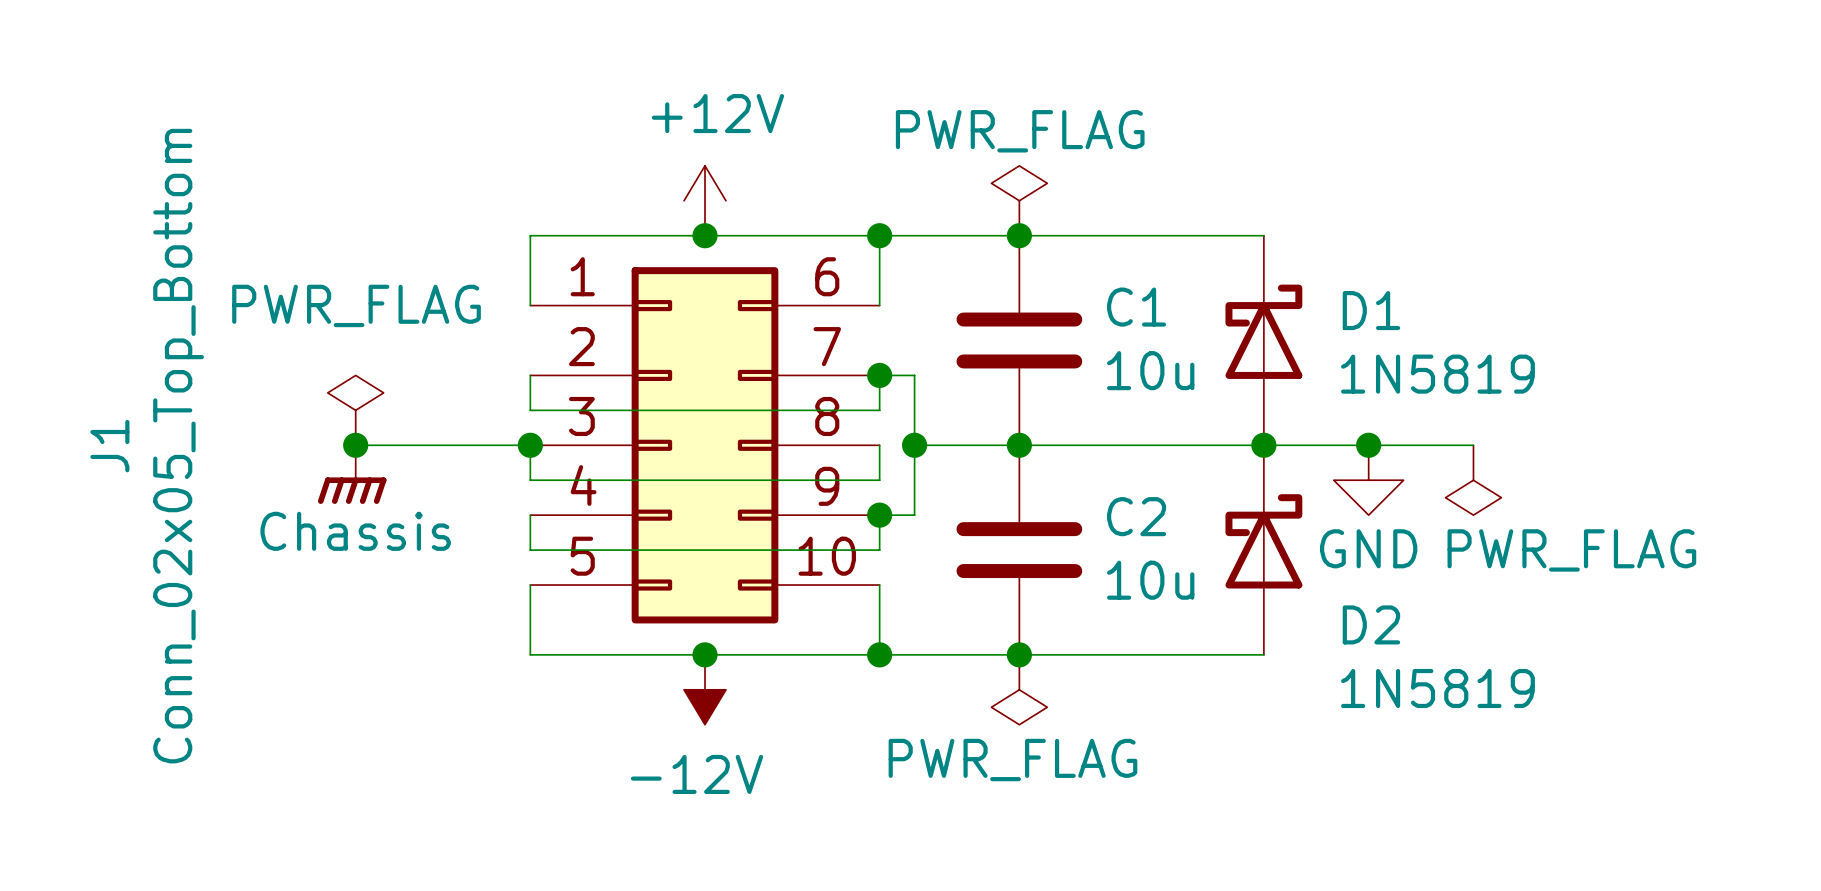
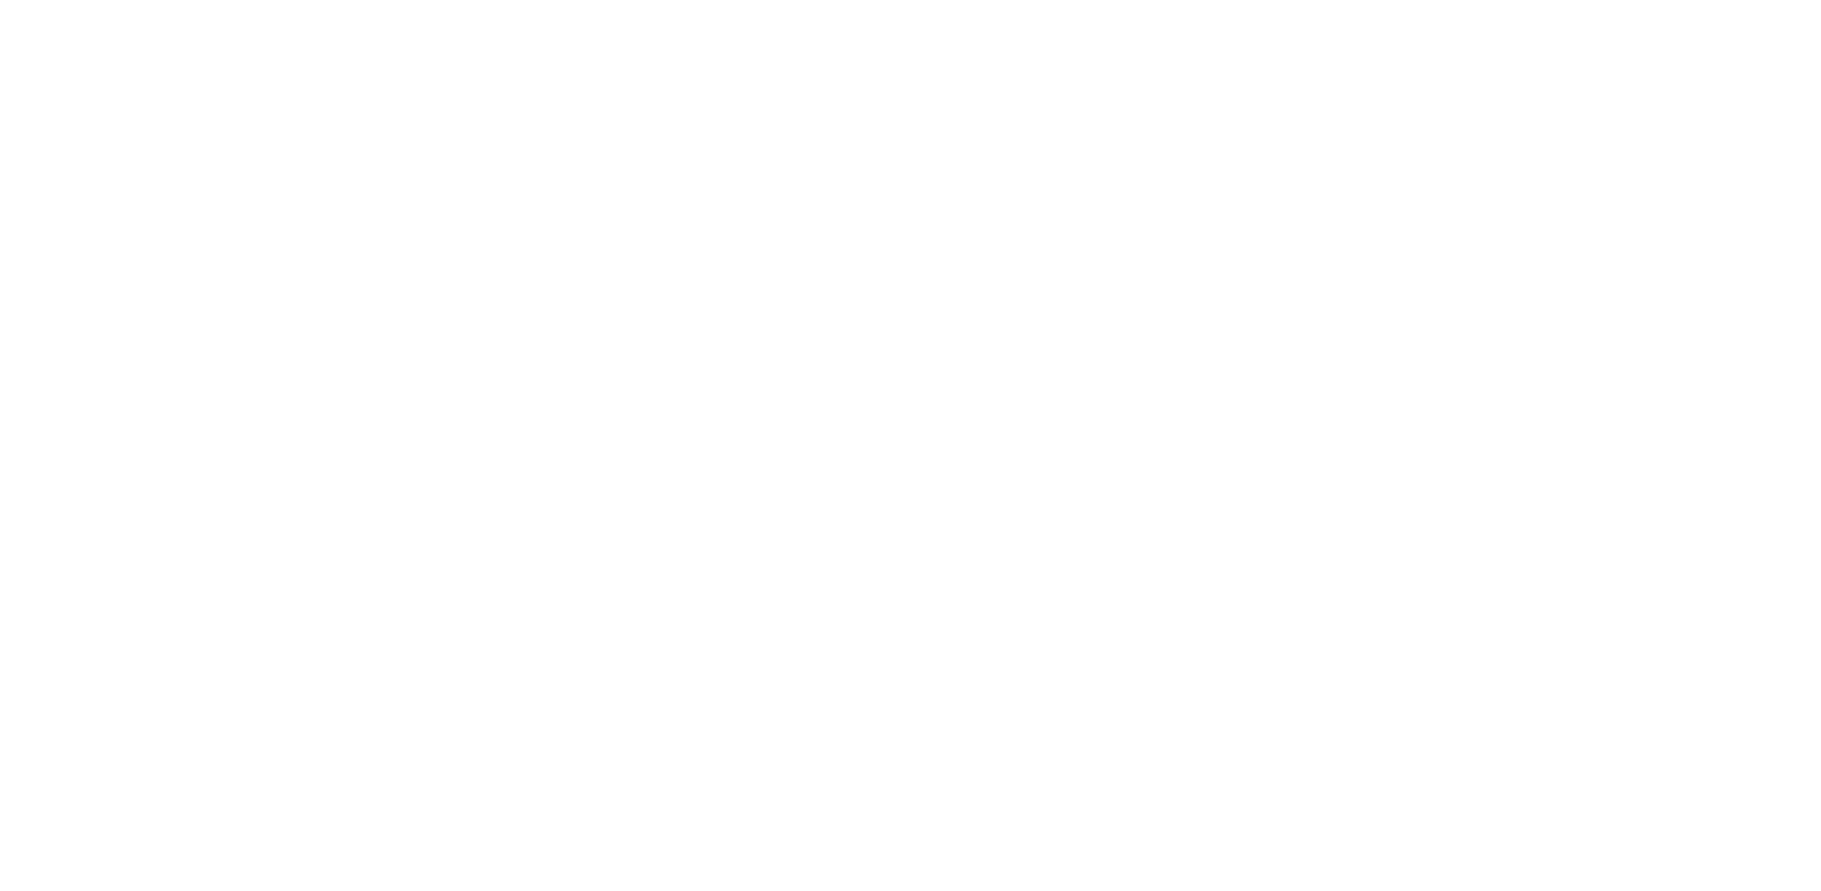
power symbol: +12V (705, 200) -> none
power symbol: PWR_FLAG (1019, 200) -> none
junction: (705, 235) -> none
wire: (879, 235) (879, 305) -> none
junction: (879, 235) -> none
junction: (1019, 235) -> none
wire: (1263, 235) (530, 235) (530, 305) -> none
C1: 10u (1019, 340) -> none
D1: 1N5819 (1263, 340) -> none
wire: (530, 375) (530, 410) (879, 410) (879, 375) (914, 375) (914, 515) (879, 515) (879, 550) (530, 550) (530, 515) -> none
junction: (879, 375) -> none
power symbol: PWR_FLAG (355, 410) -> none
wire: (355, 445) (530, 445) (530, 480) (879, 480) (879, 445) -> none
junction: (355, 445) -> none
junction: (530, 445) -> none
J1: Conn_02x05_Top_Bottom (705, 445) -> none
wire: (914, 445) (1473, 445) -> none
junction: (914, 445) -> none
junction: (1019, 445) -> none
junction: (1263, 445) -> none
junction: (1368, 445) -> none
power symbol: Chassis (352, 474) -> none
power symbol: GND (1368, 480) -> none
power symbol: PWR_FLAG (1473, 480) -> none
junction: (879, 515) -> none
C2: 10u (1019, 550) -> none
D2: 1N5819 (1263, 550) -> none
wire: (530, 585) (530, 654) (1263, 654) -> none
wire: (879, 585) (879, 654) -> none
junction: (705, 654) -> none
junction: (879, 654) -> none
junction: (1019, 654) -> none
power symbol: -12V (705, 689) -> none
power symbol: PWR_FLAG (1019, 689) -> none

